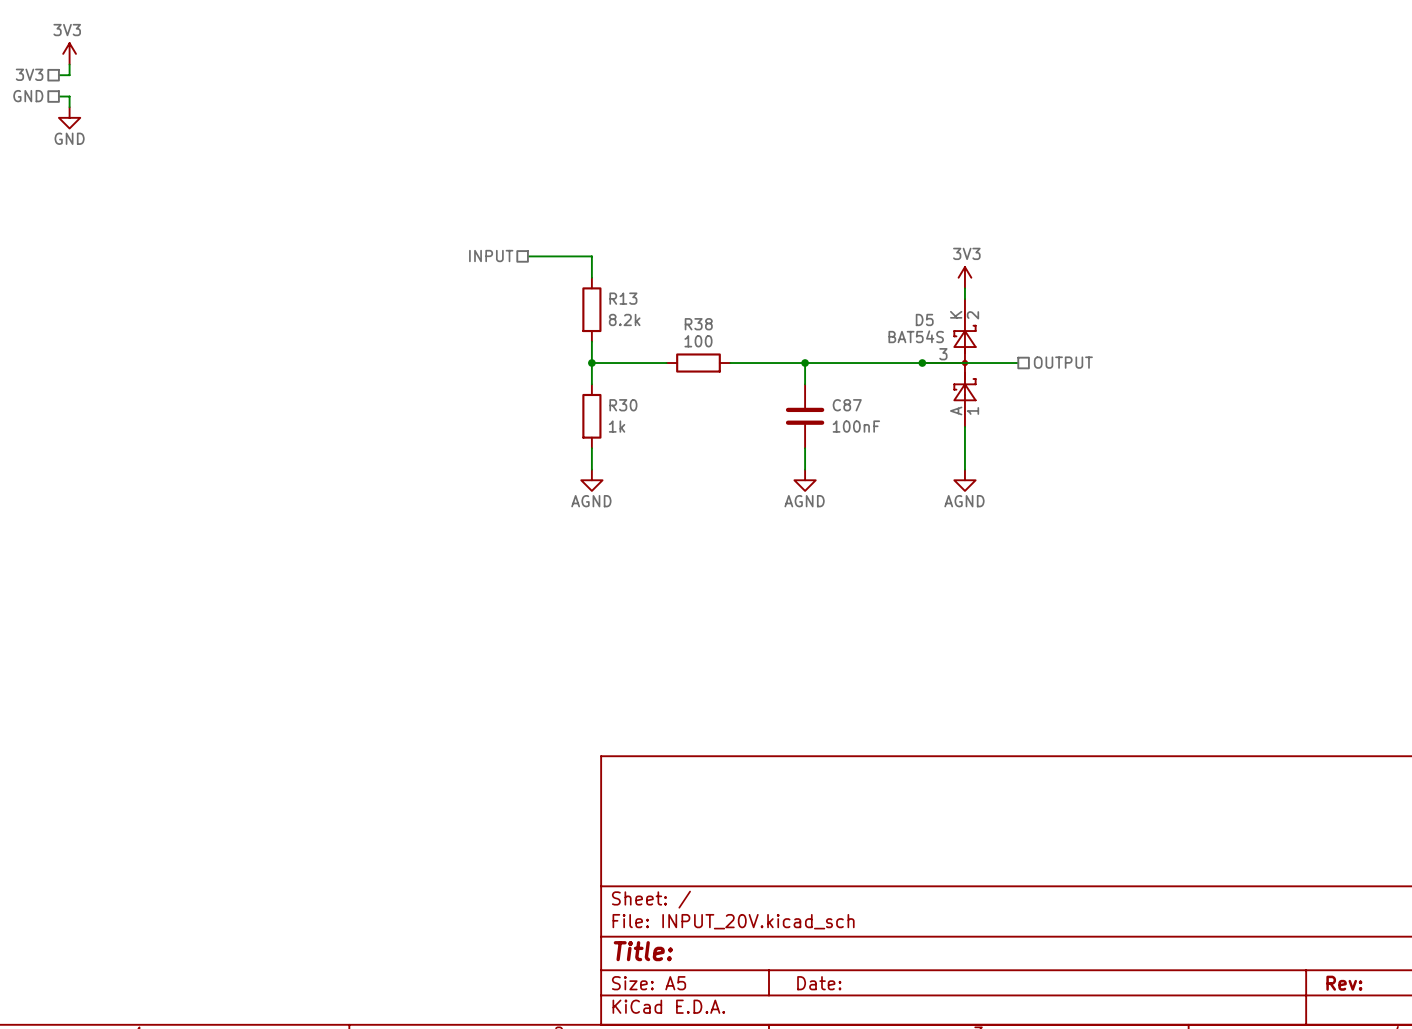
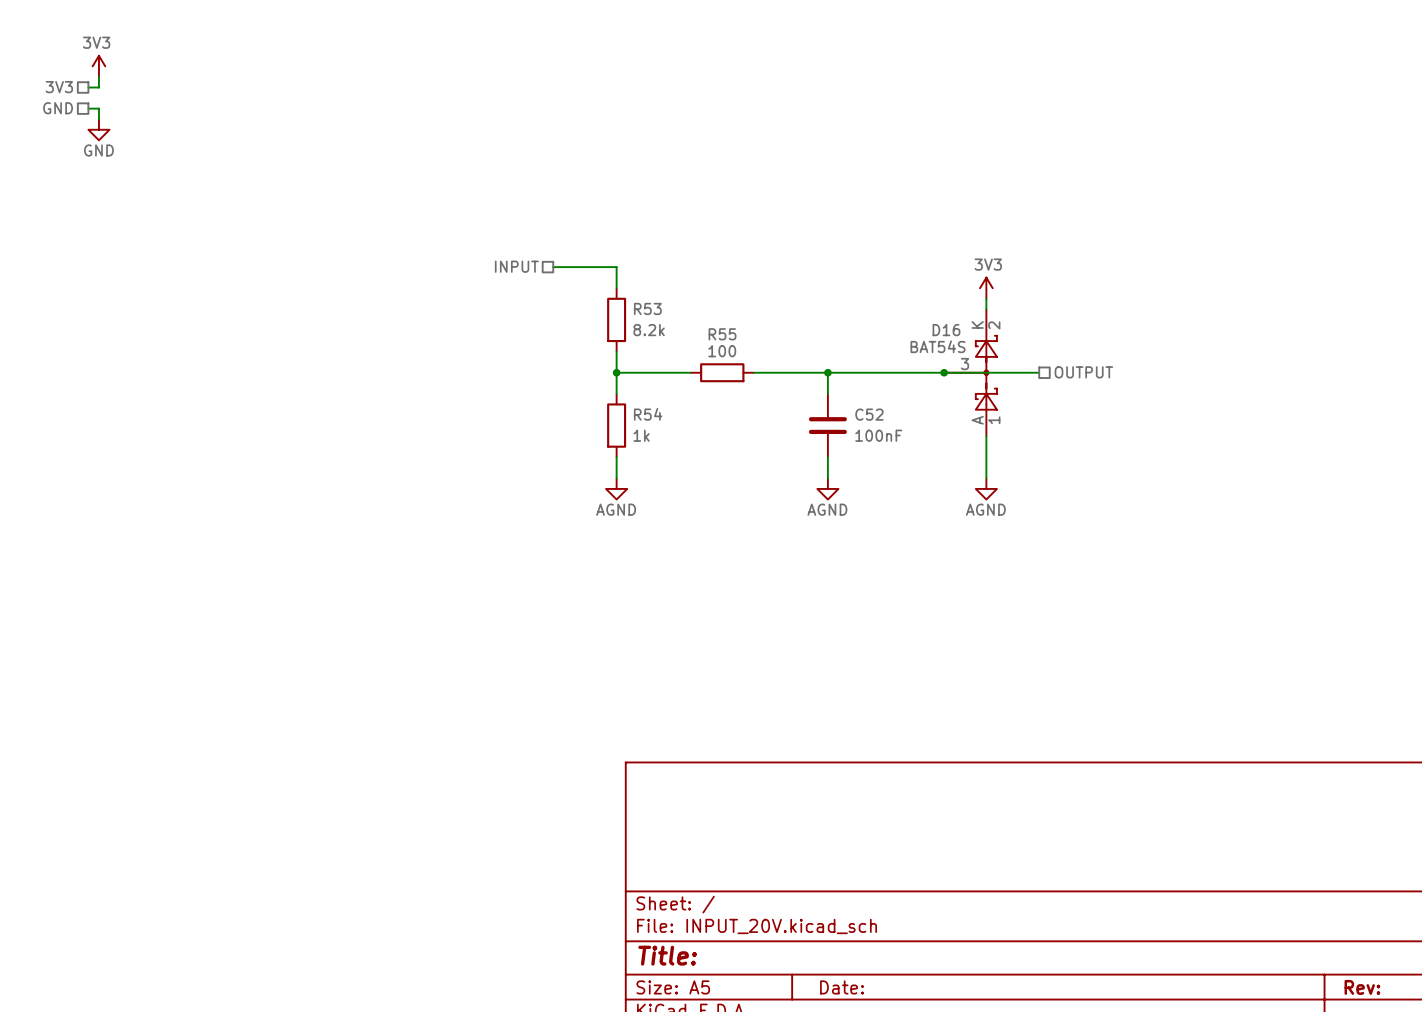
R13 name: R13 (623, 298) -> R53 (647, 308)
D5 name: D5 (924, 319) -> D16 (946, 330)
R38 name: R38 (698, 324) -> R55 (722, 334)
R30 name: R30 (623, 405) -> R54 (648, 414)
C87 name: C87 (847, 405) -> C52 (869, 414)

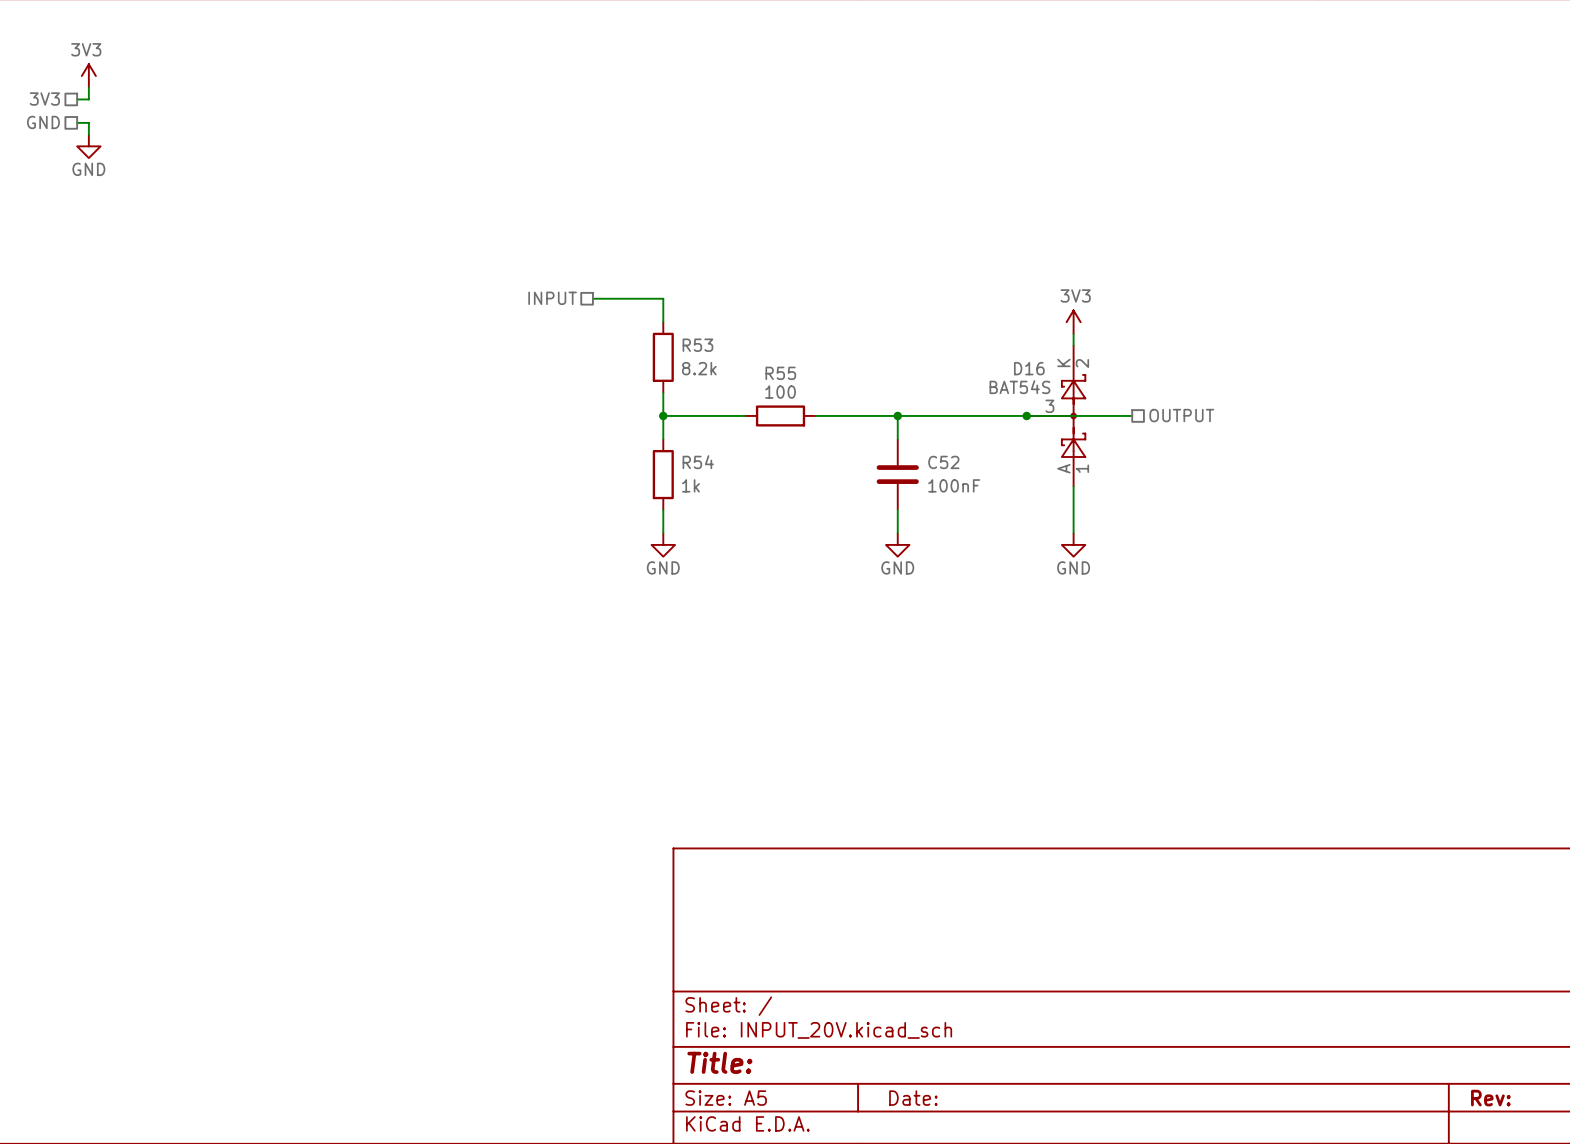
power symbol: AGND (616, 488) -> GND (663, 544)
power symbol: AGND (827, 488) -> GND (897, 544)
power symbol: AGND (986, 488) -> GND (1073, 544)

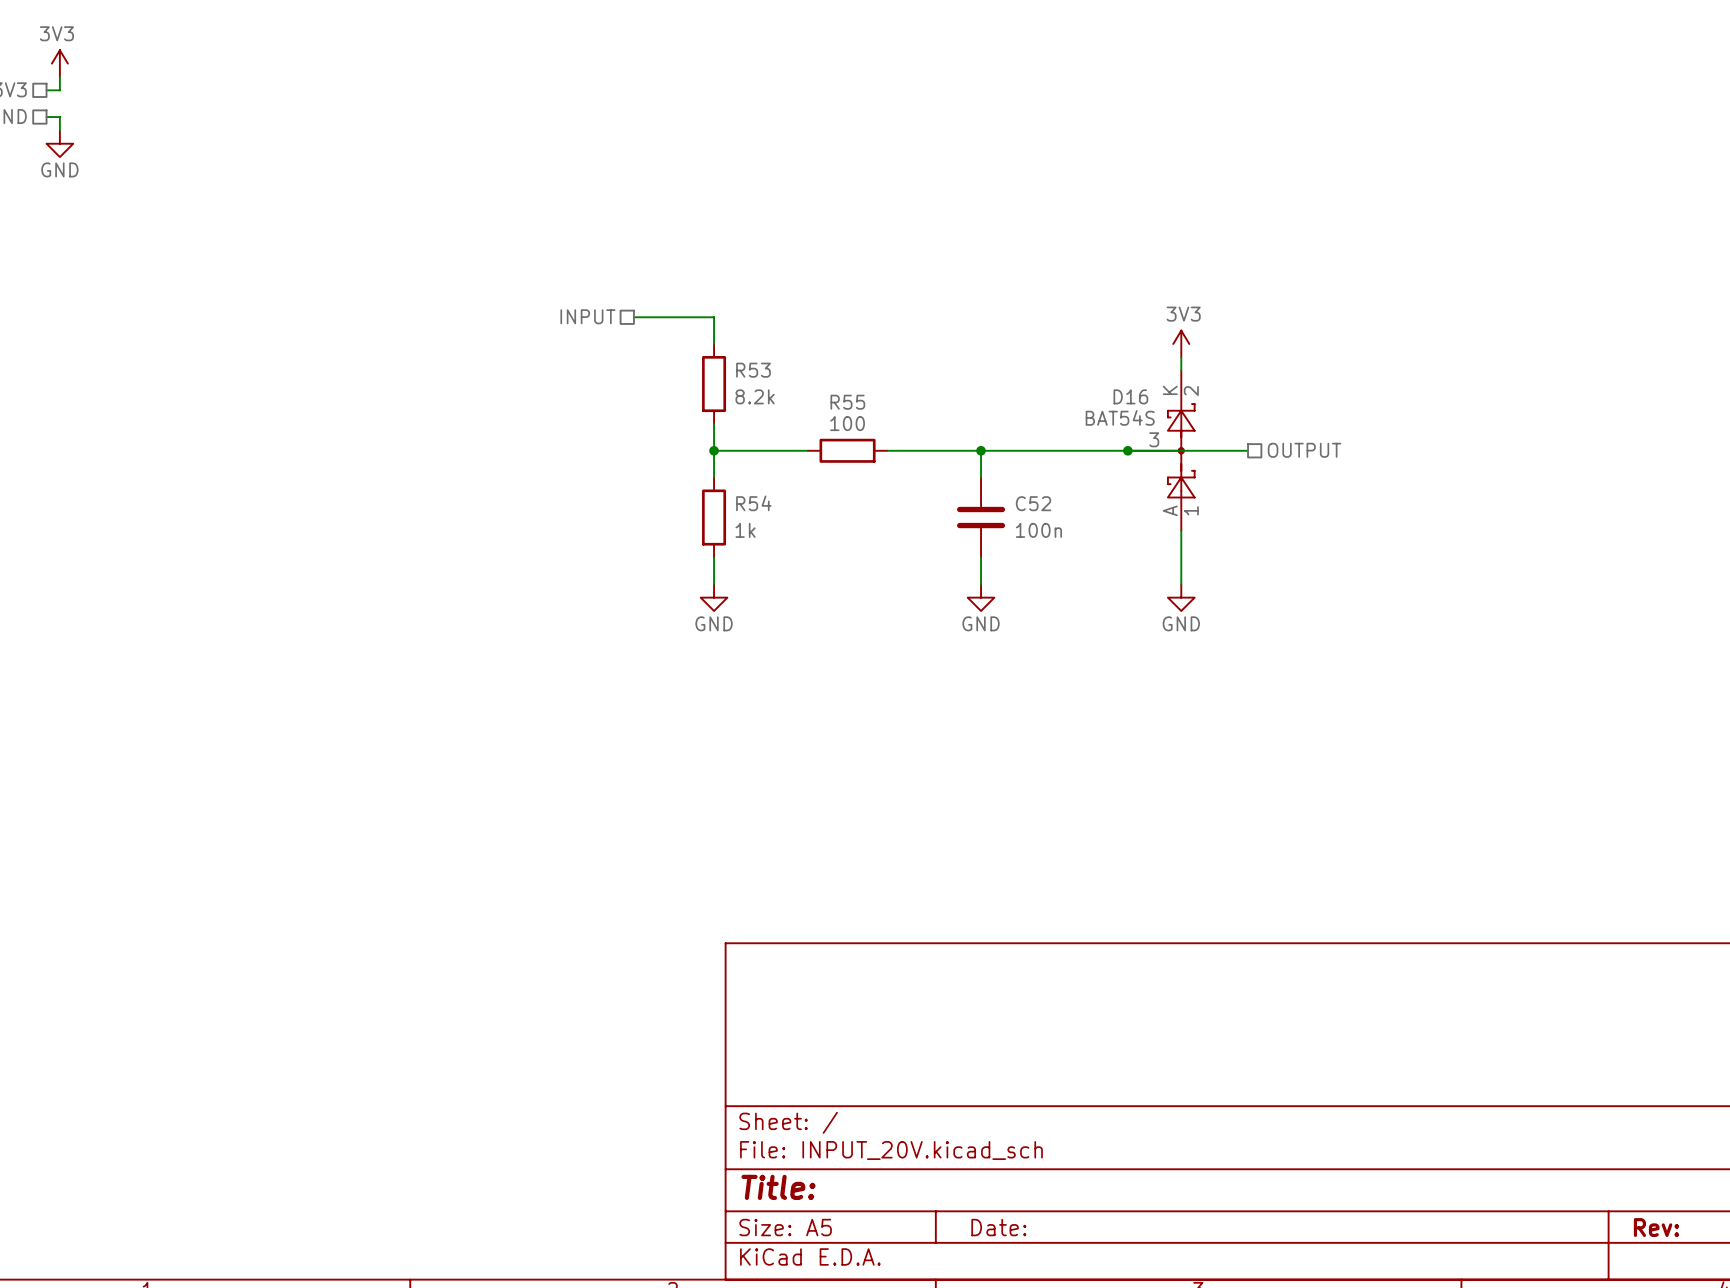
C52 value: 100nF (954, 485) -> 100n (1038, 530)

